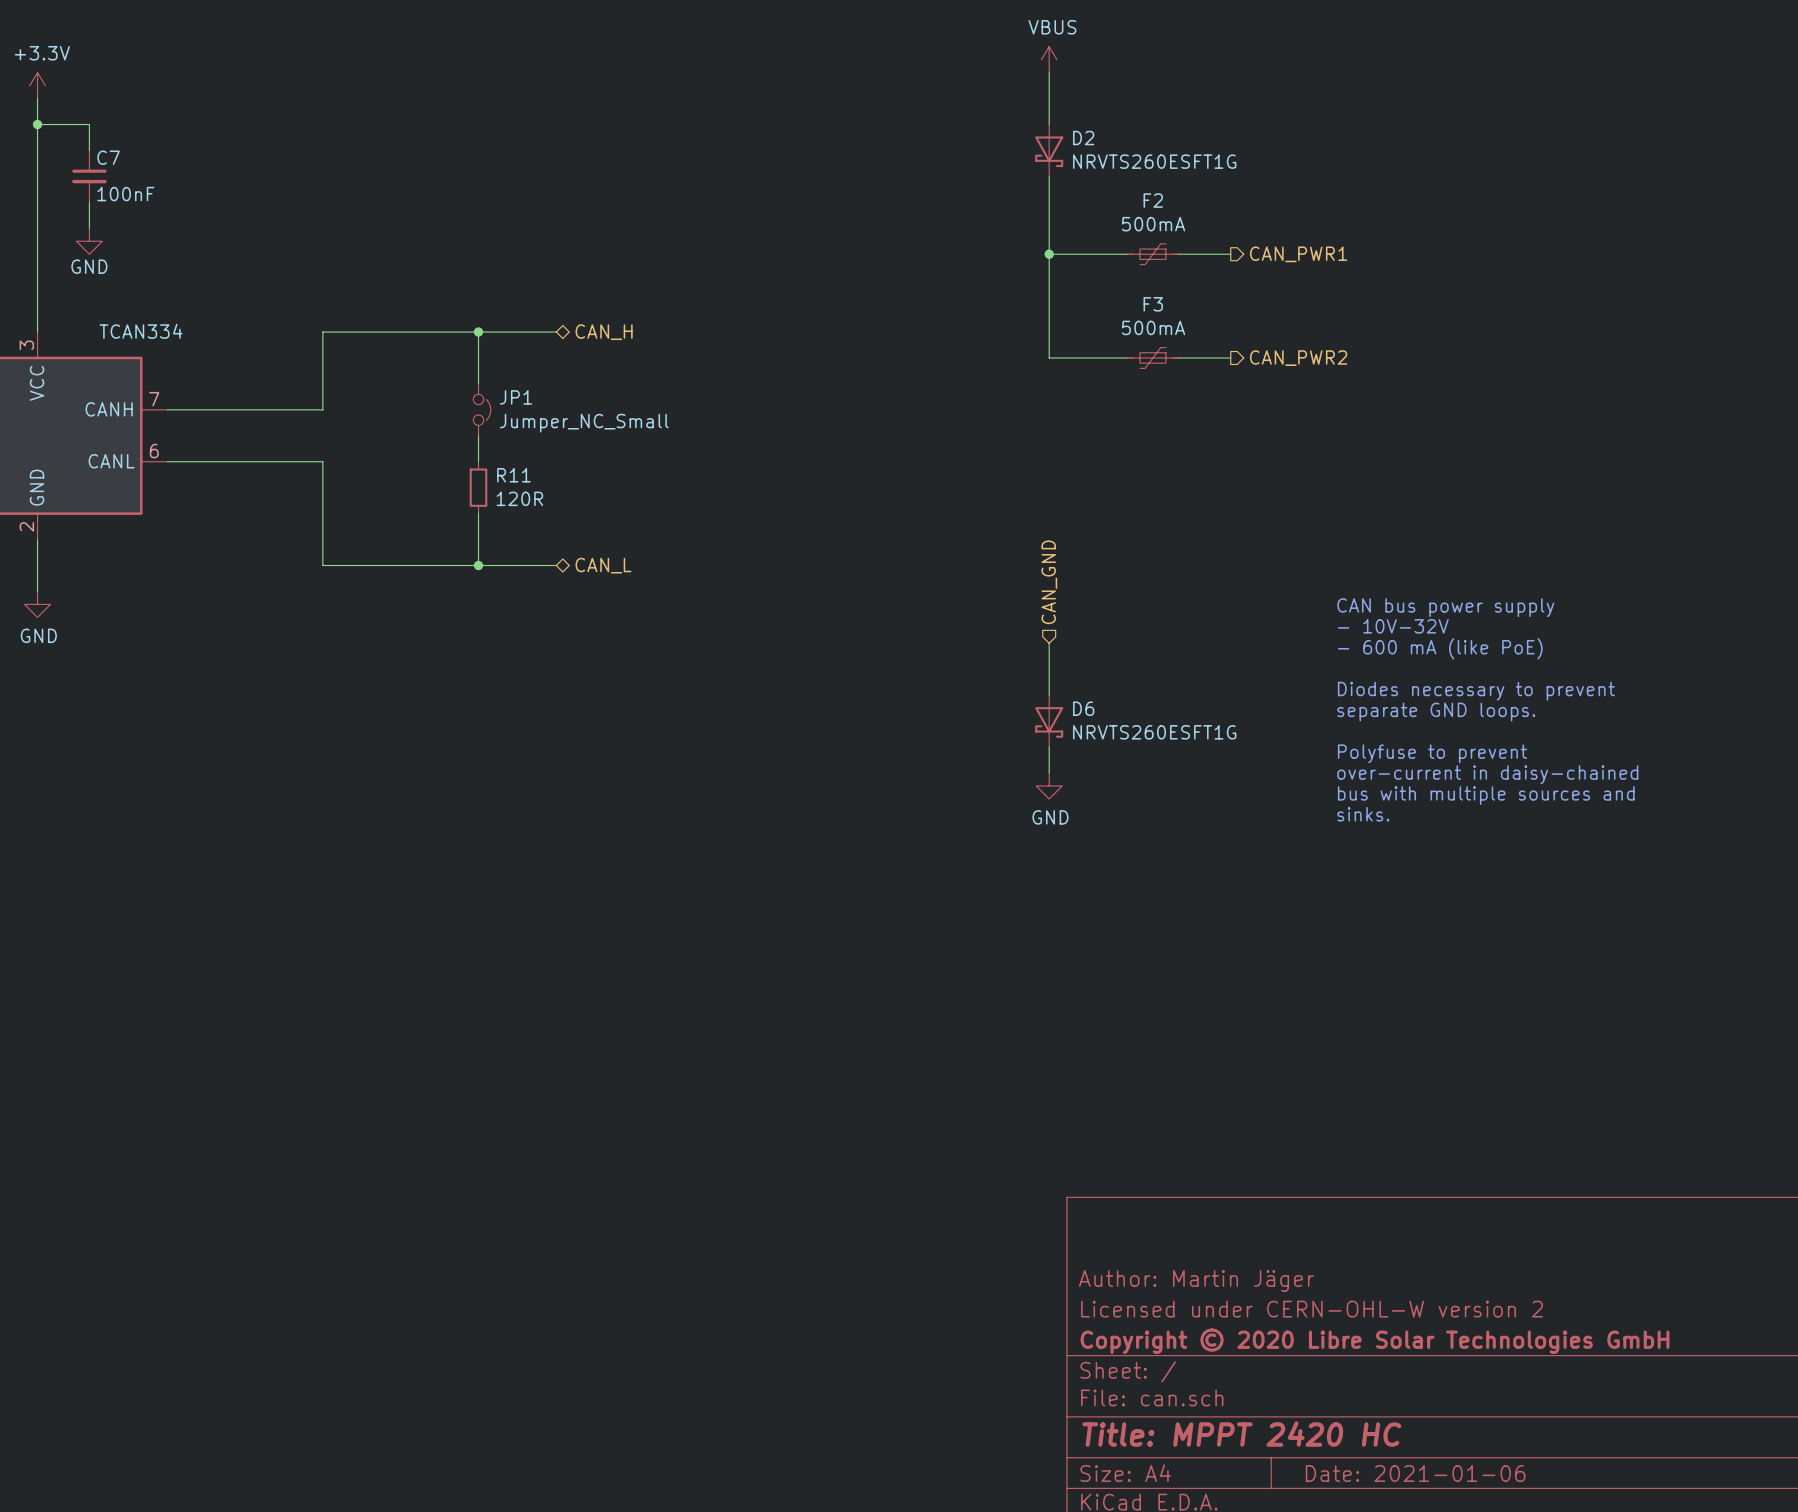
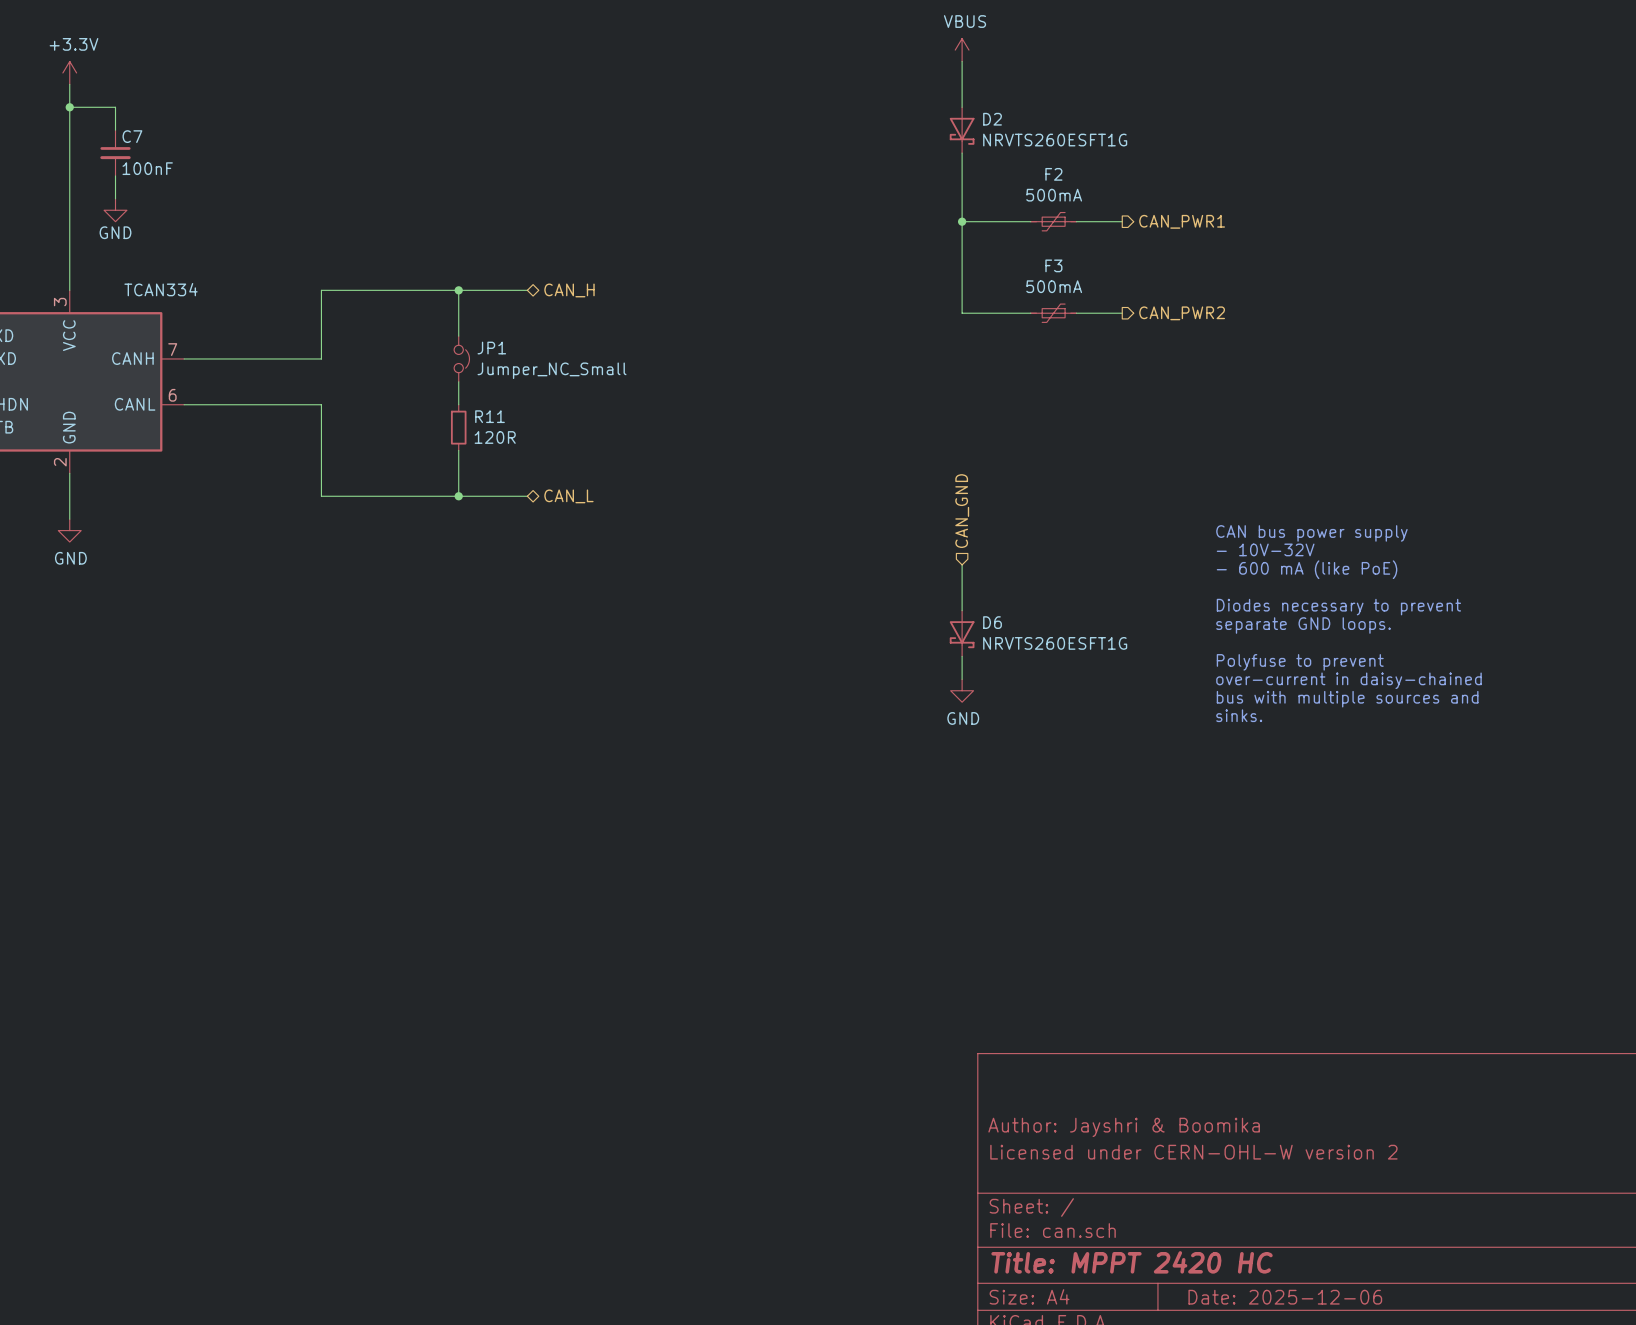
title block: Author: Martin Jäger (1196, 1281) -> Author: Jayshri & Boomika (1124, 1127)
title block: Copyright © 2020 Libre Solar Technologies GmbH (1375, 1341) -> none
title block: Date: 2021-01-06 (1415, 1473) -> Date: 2025-12-06 (1285, 1297)

